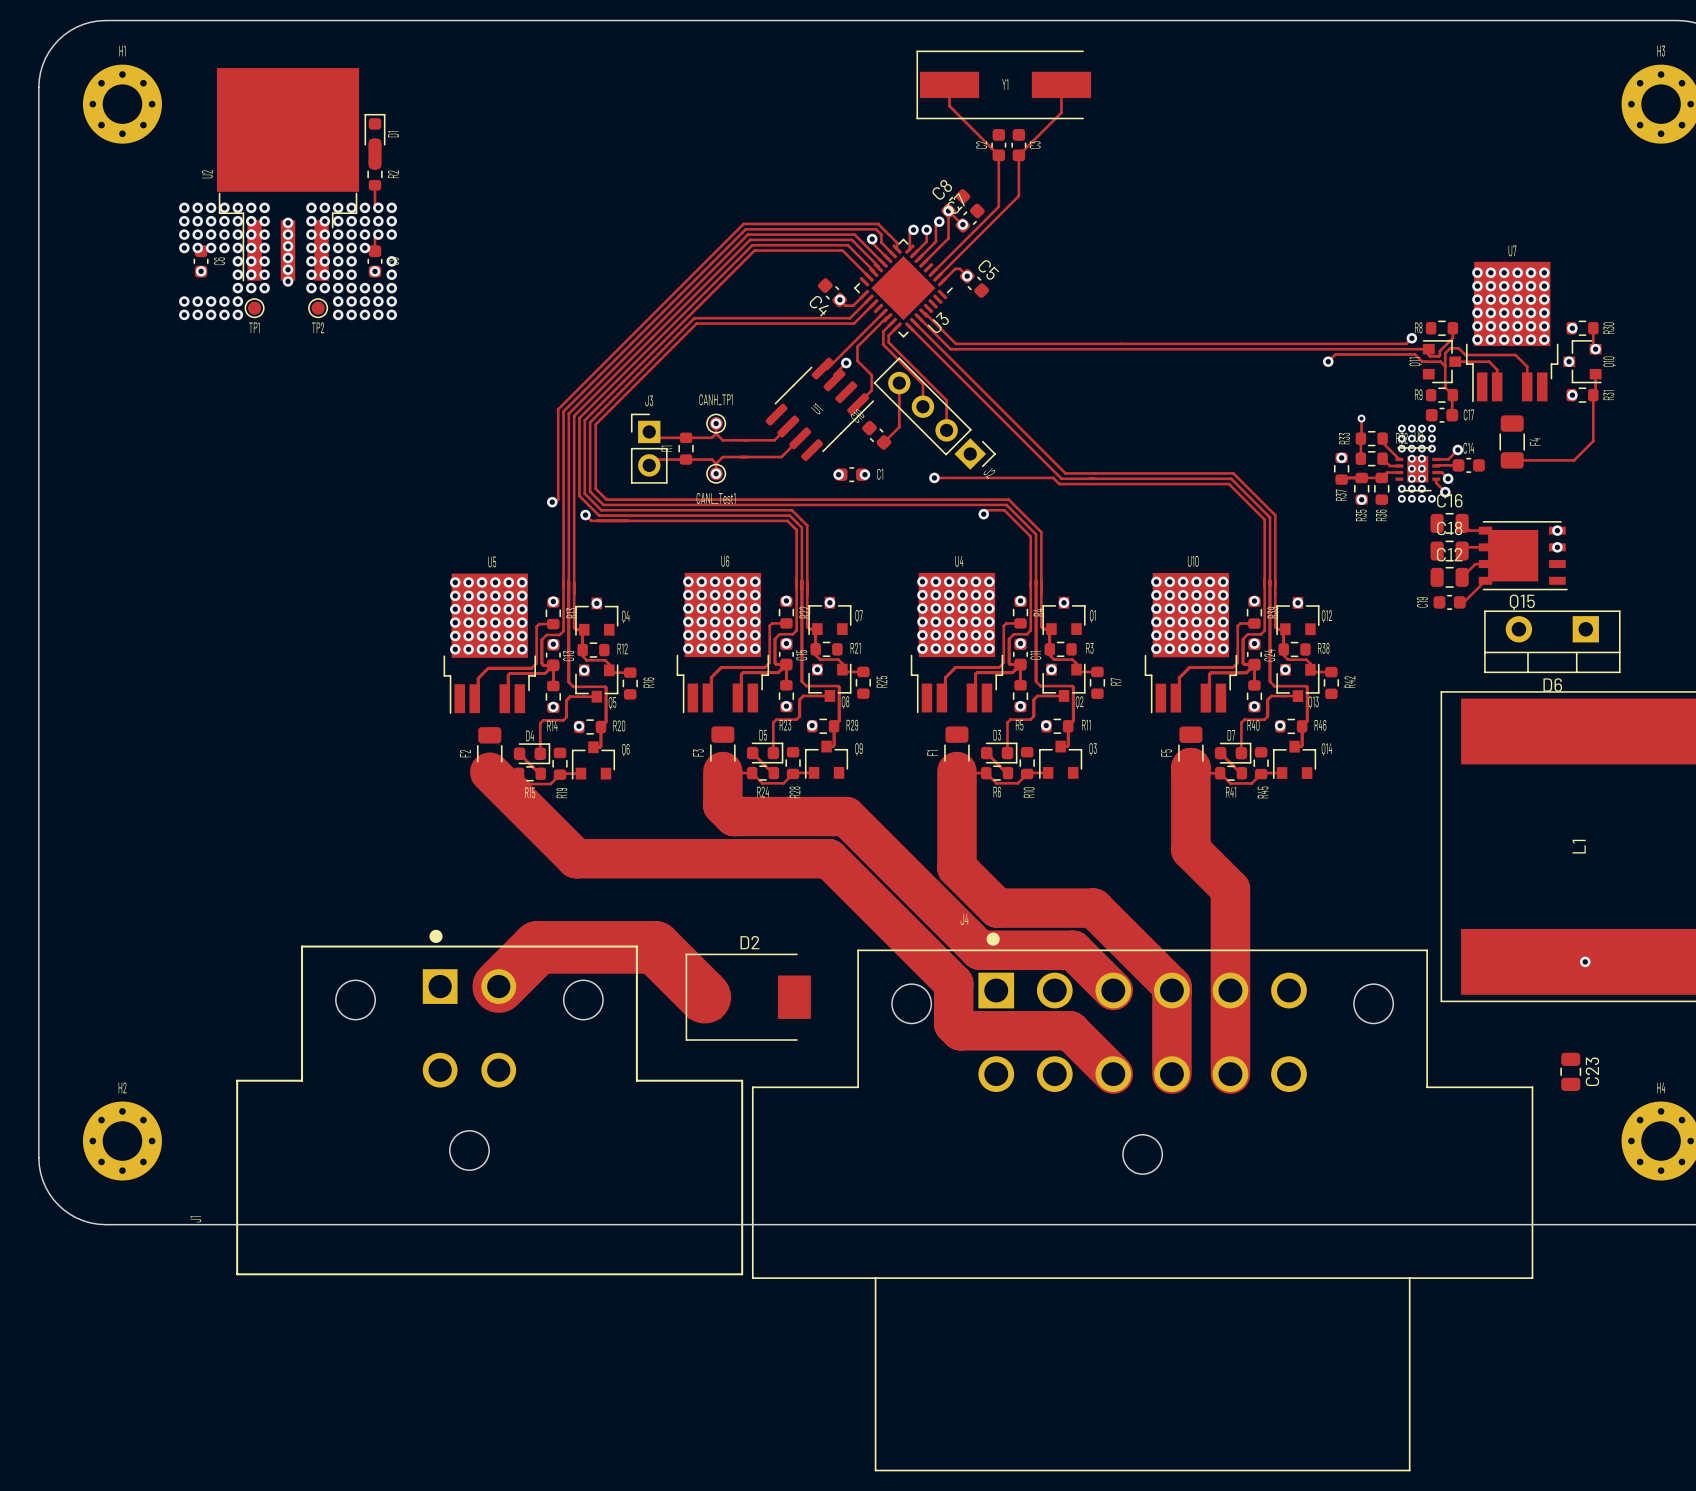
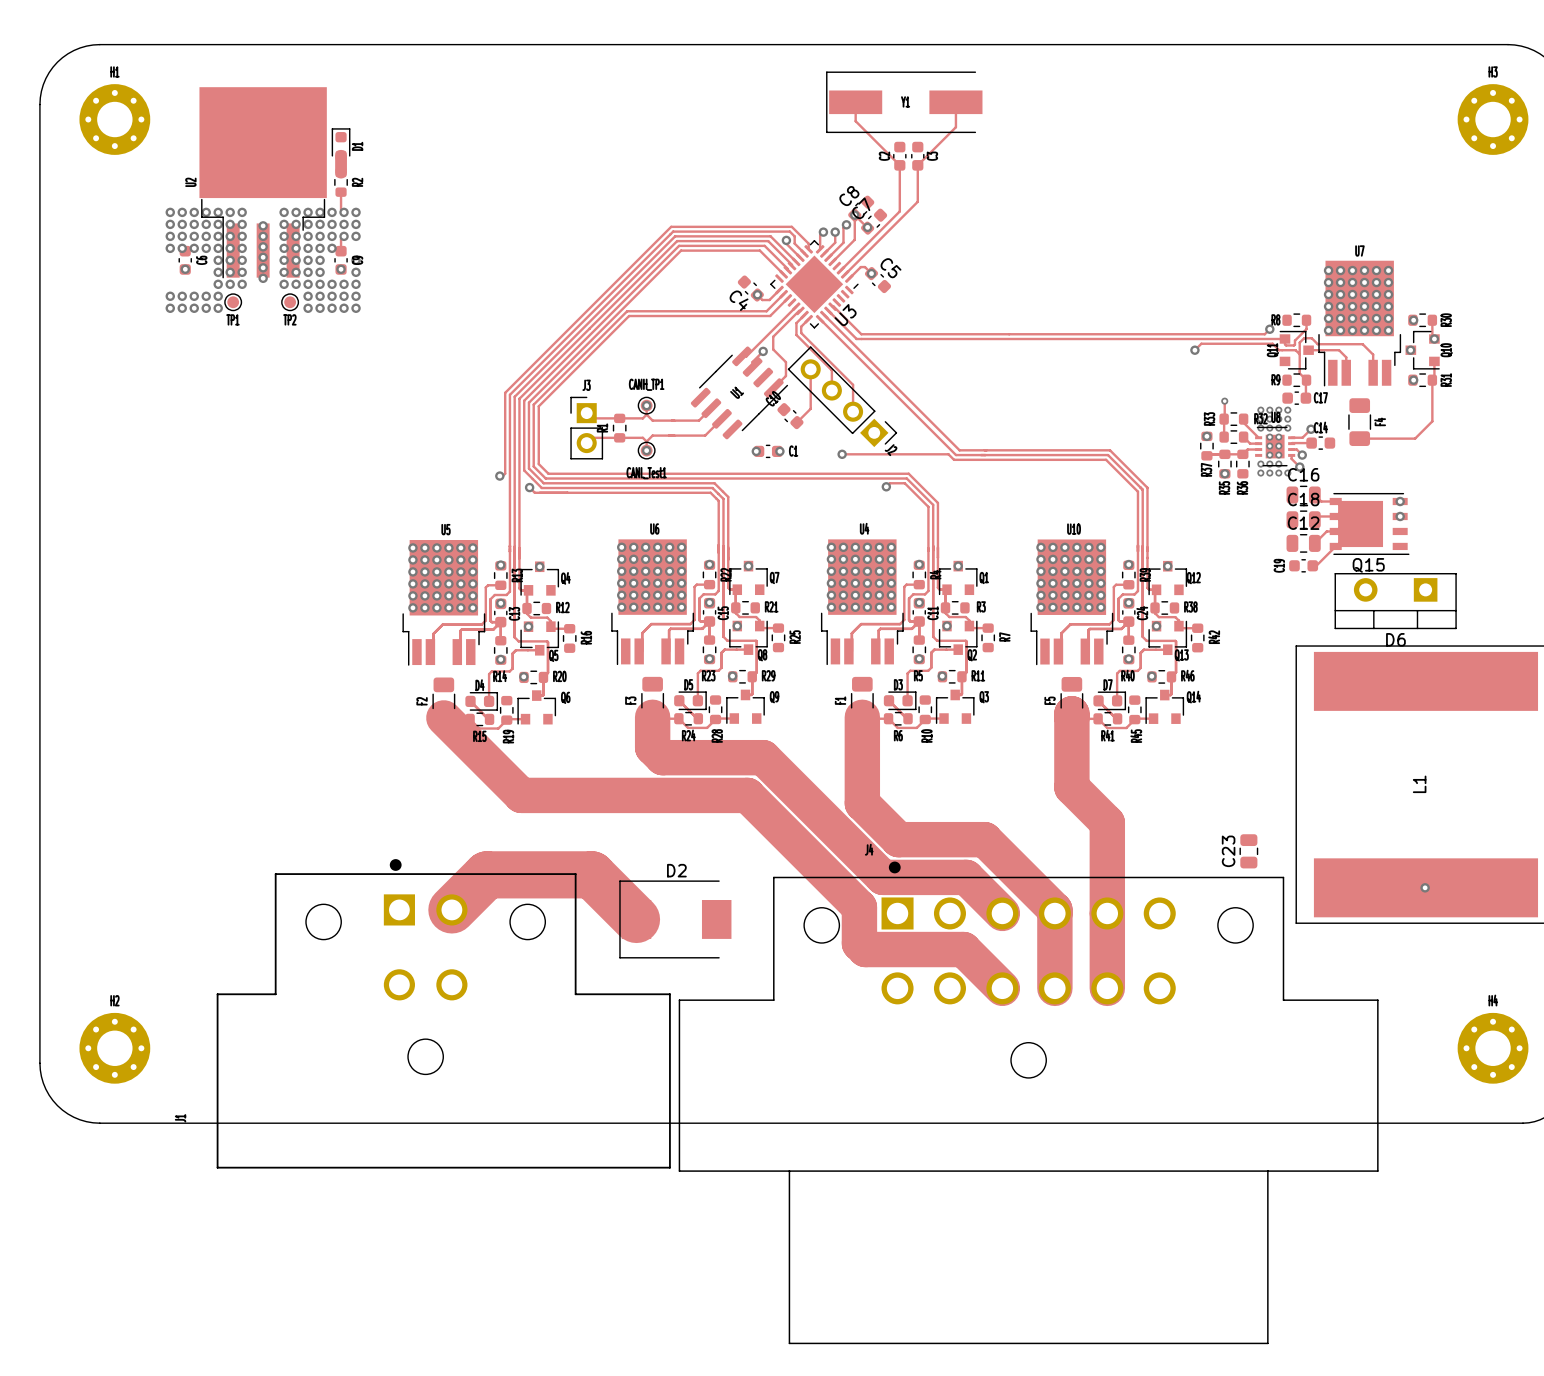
C23 position: (1570, 1071) -> (1248, 851)
C23 name position: C23 (1592, 1071) -> C23 (1228, 851)

